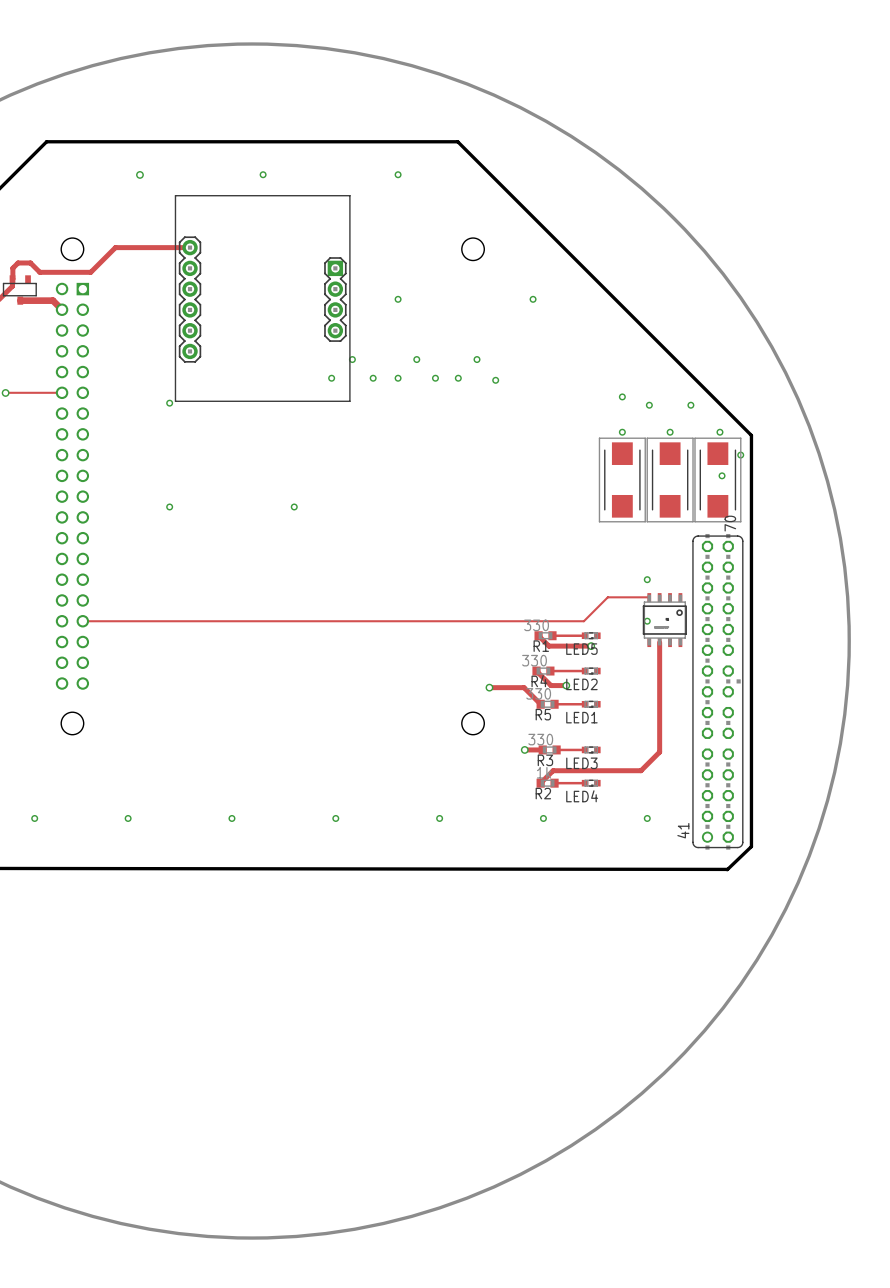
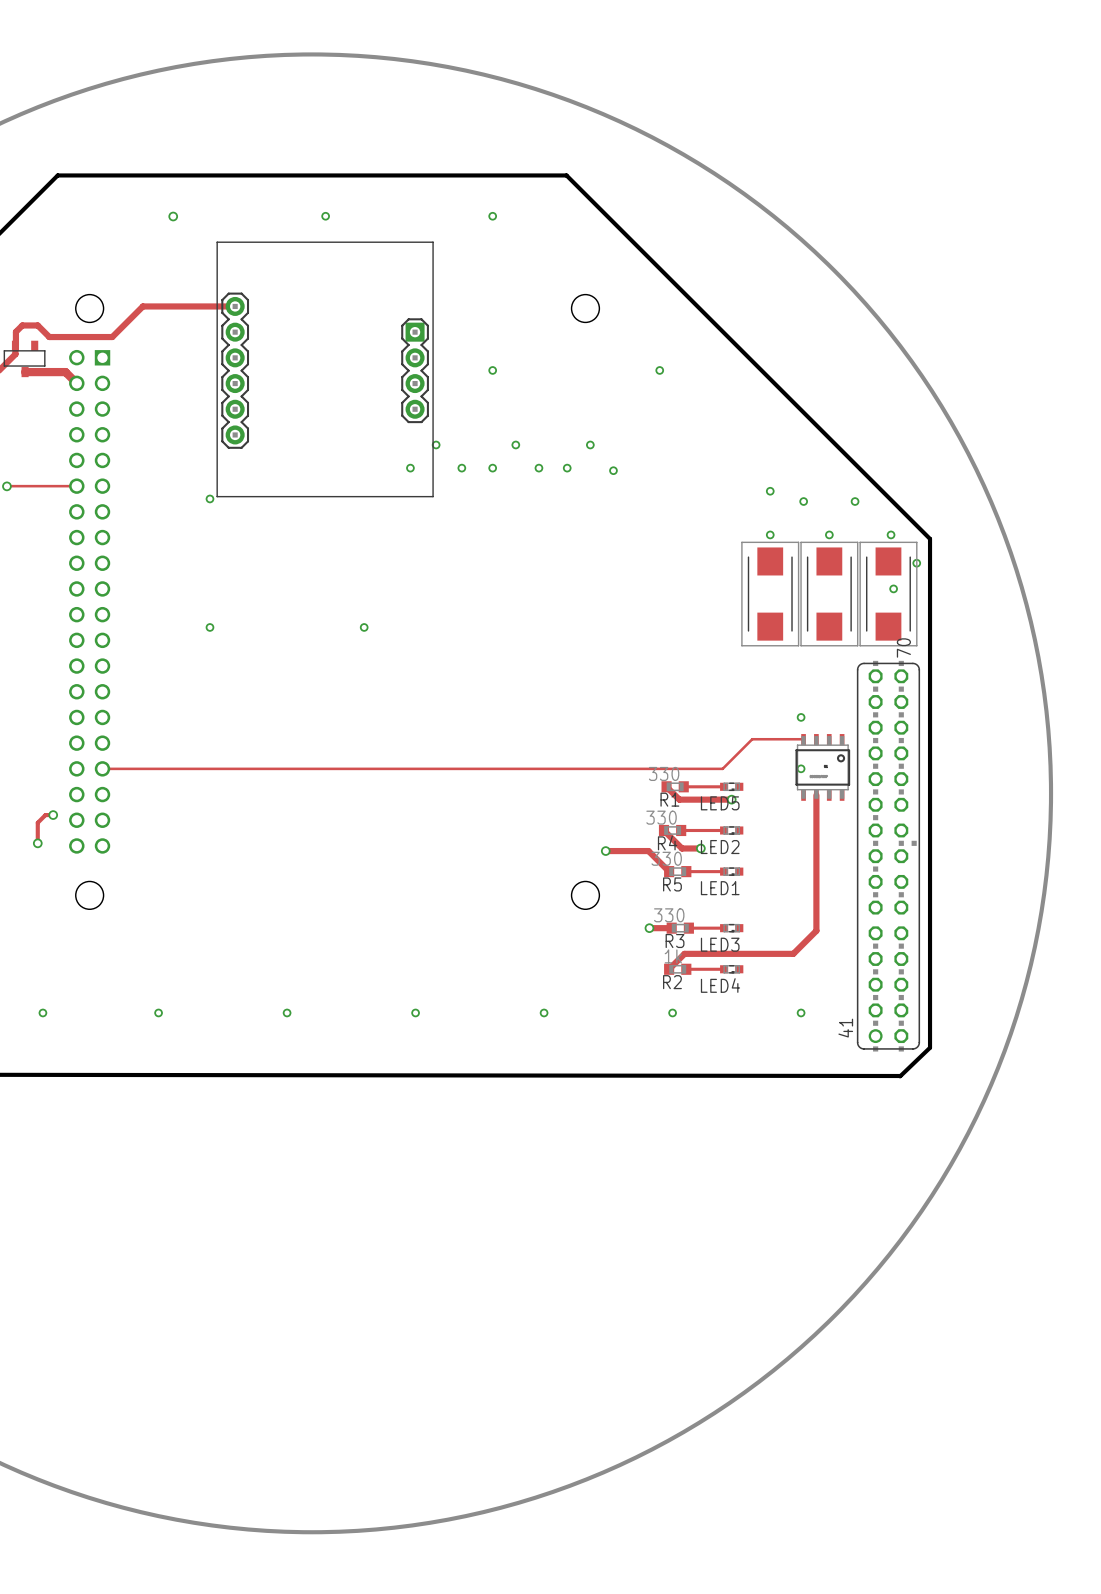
track: none -> (53, 815) (45, 815) (37, 822) (37, 843)
via: none -> (53, 815)
via: none -> (37, 843)

